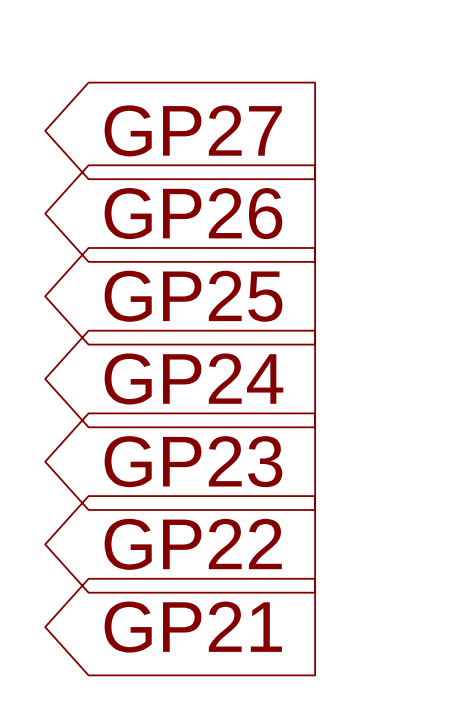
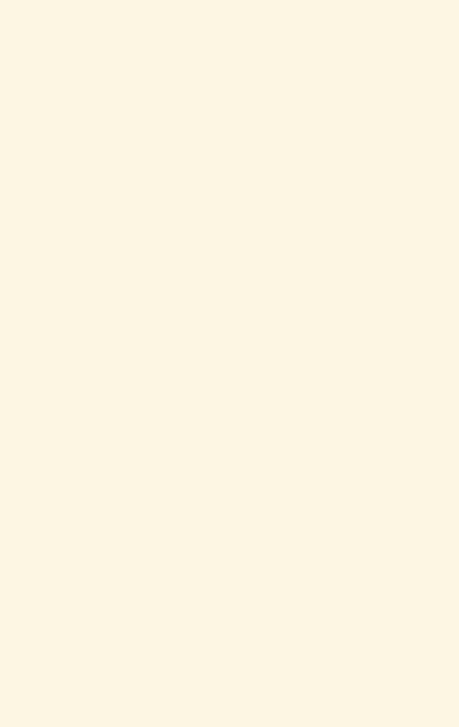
global label: GP27 (193, 130) -> none
global label: GP26 (193, 213) -> none
global label: GP25 (193, 296) -> none
global label: GP24 (193, 378) -> none
global label: GP23 (193, 461) -> none
global label: GP22 (193, 544) -> none
global label: GP21 (193, 627) -> none

